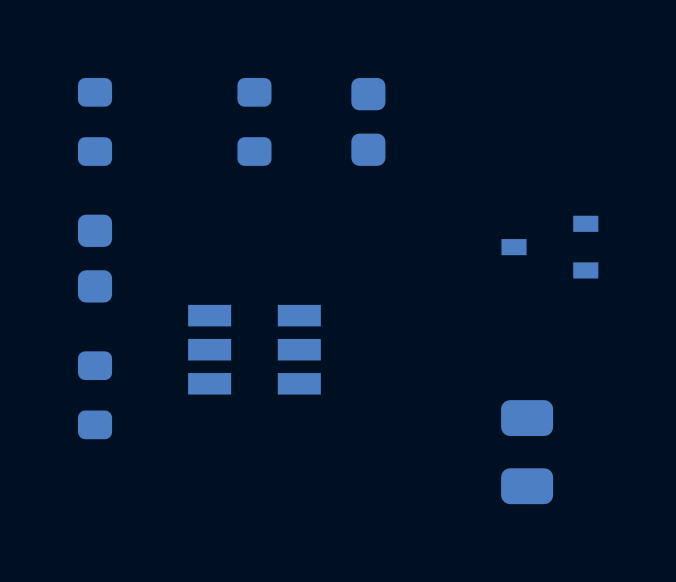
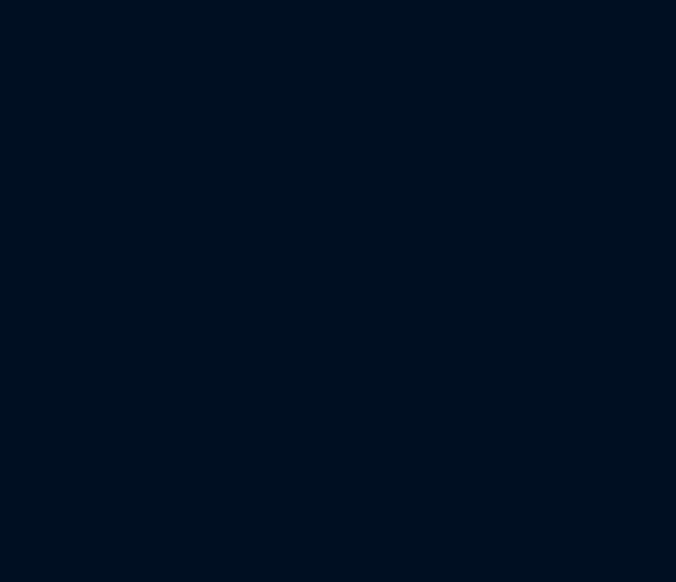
part: (95, 121) -> none
part: (254, 121) -> none
part: (368, 121) -> none
part: (549, 247) -> none
part: (95, 258) -> none
part: (254, 349) -> none
part: (95, 395) -> none
part: (527, 452) -> none

